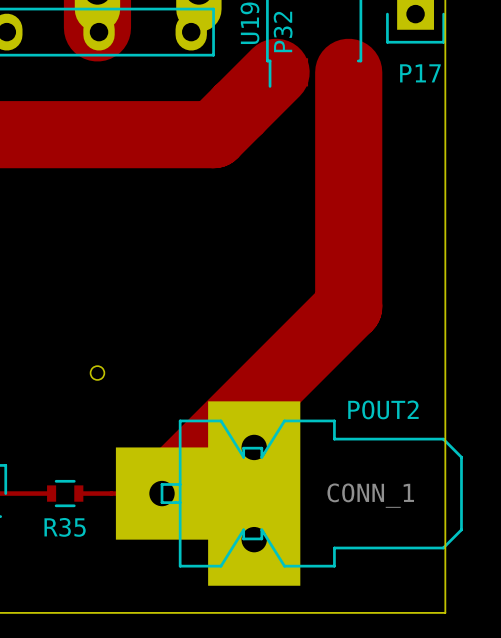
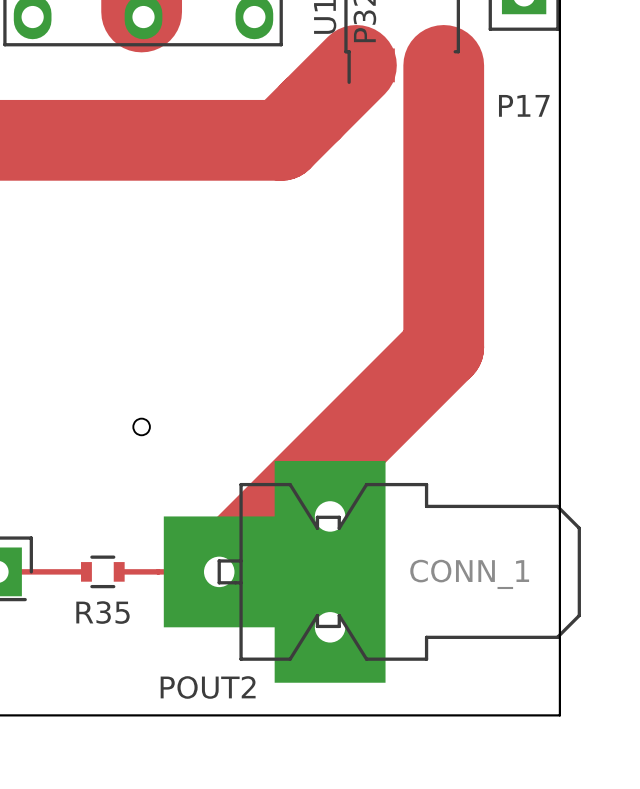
P17 name position: P17 (420, 73) -> P17 (524, 105)
POUT2 name position: POUT2 (383, 409) -> POUT2 (208, 687)

